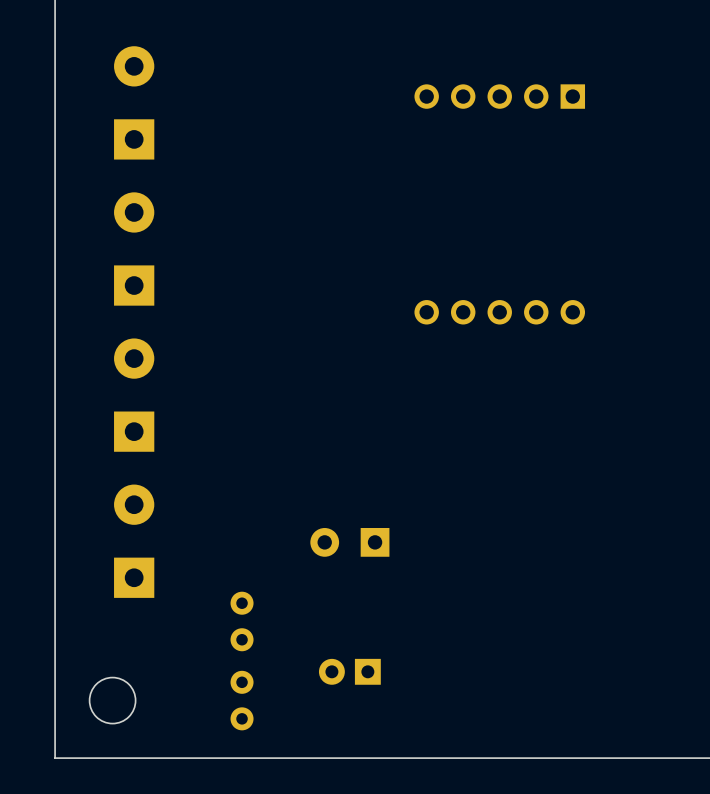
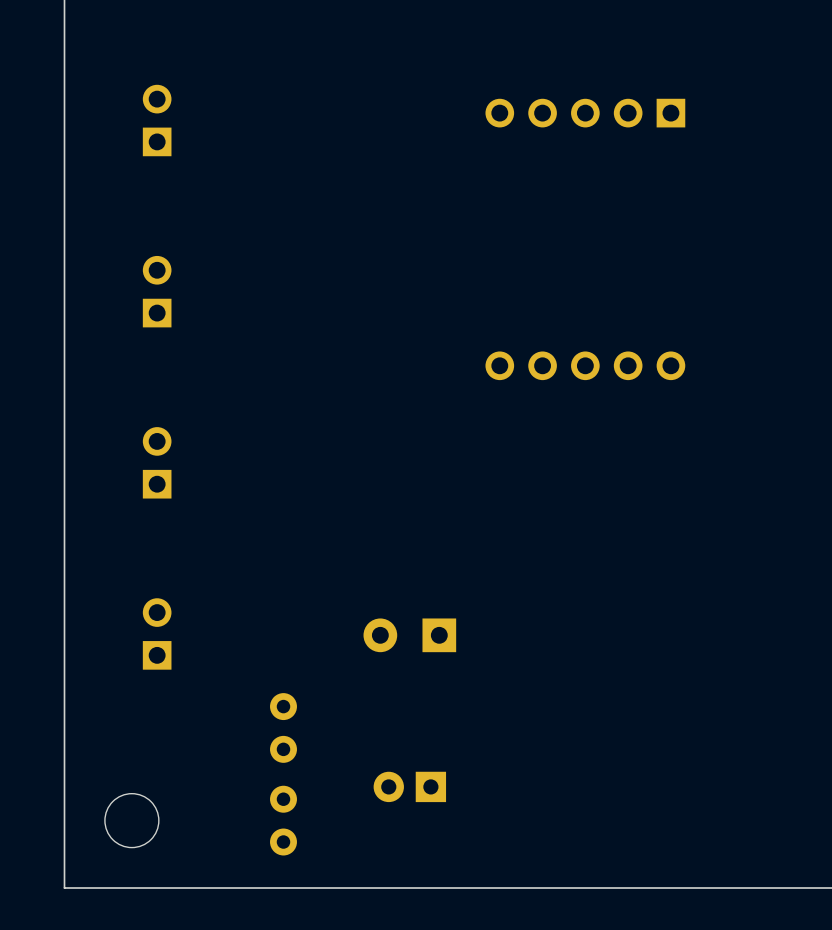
part footprint: [114, 46, 155, 160] -> [142, 84, 172, 157]
part footprint: [114, 192, 155, 306] -> [142, 255, 172, 328]
part footprint: [114, 338, 155, 452] -> [142, 427, 172, 499]
part footprint: [114, 484, 155, 598] -> [142, 598, 172, 670]

